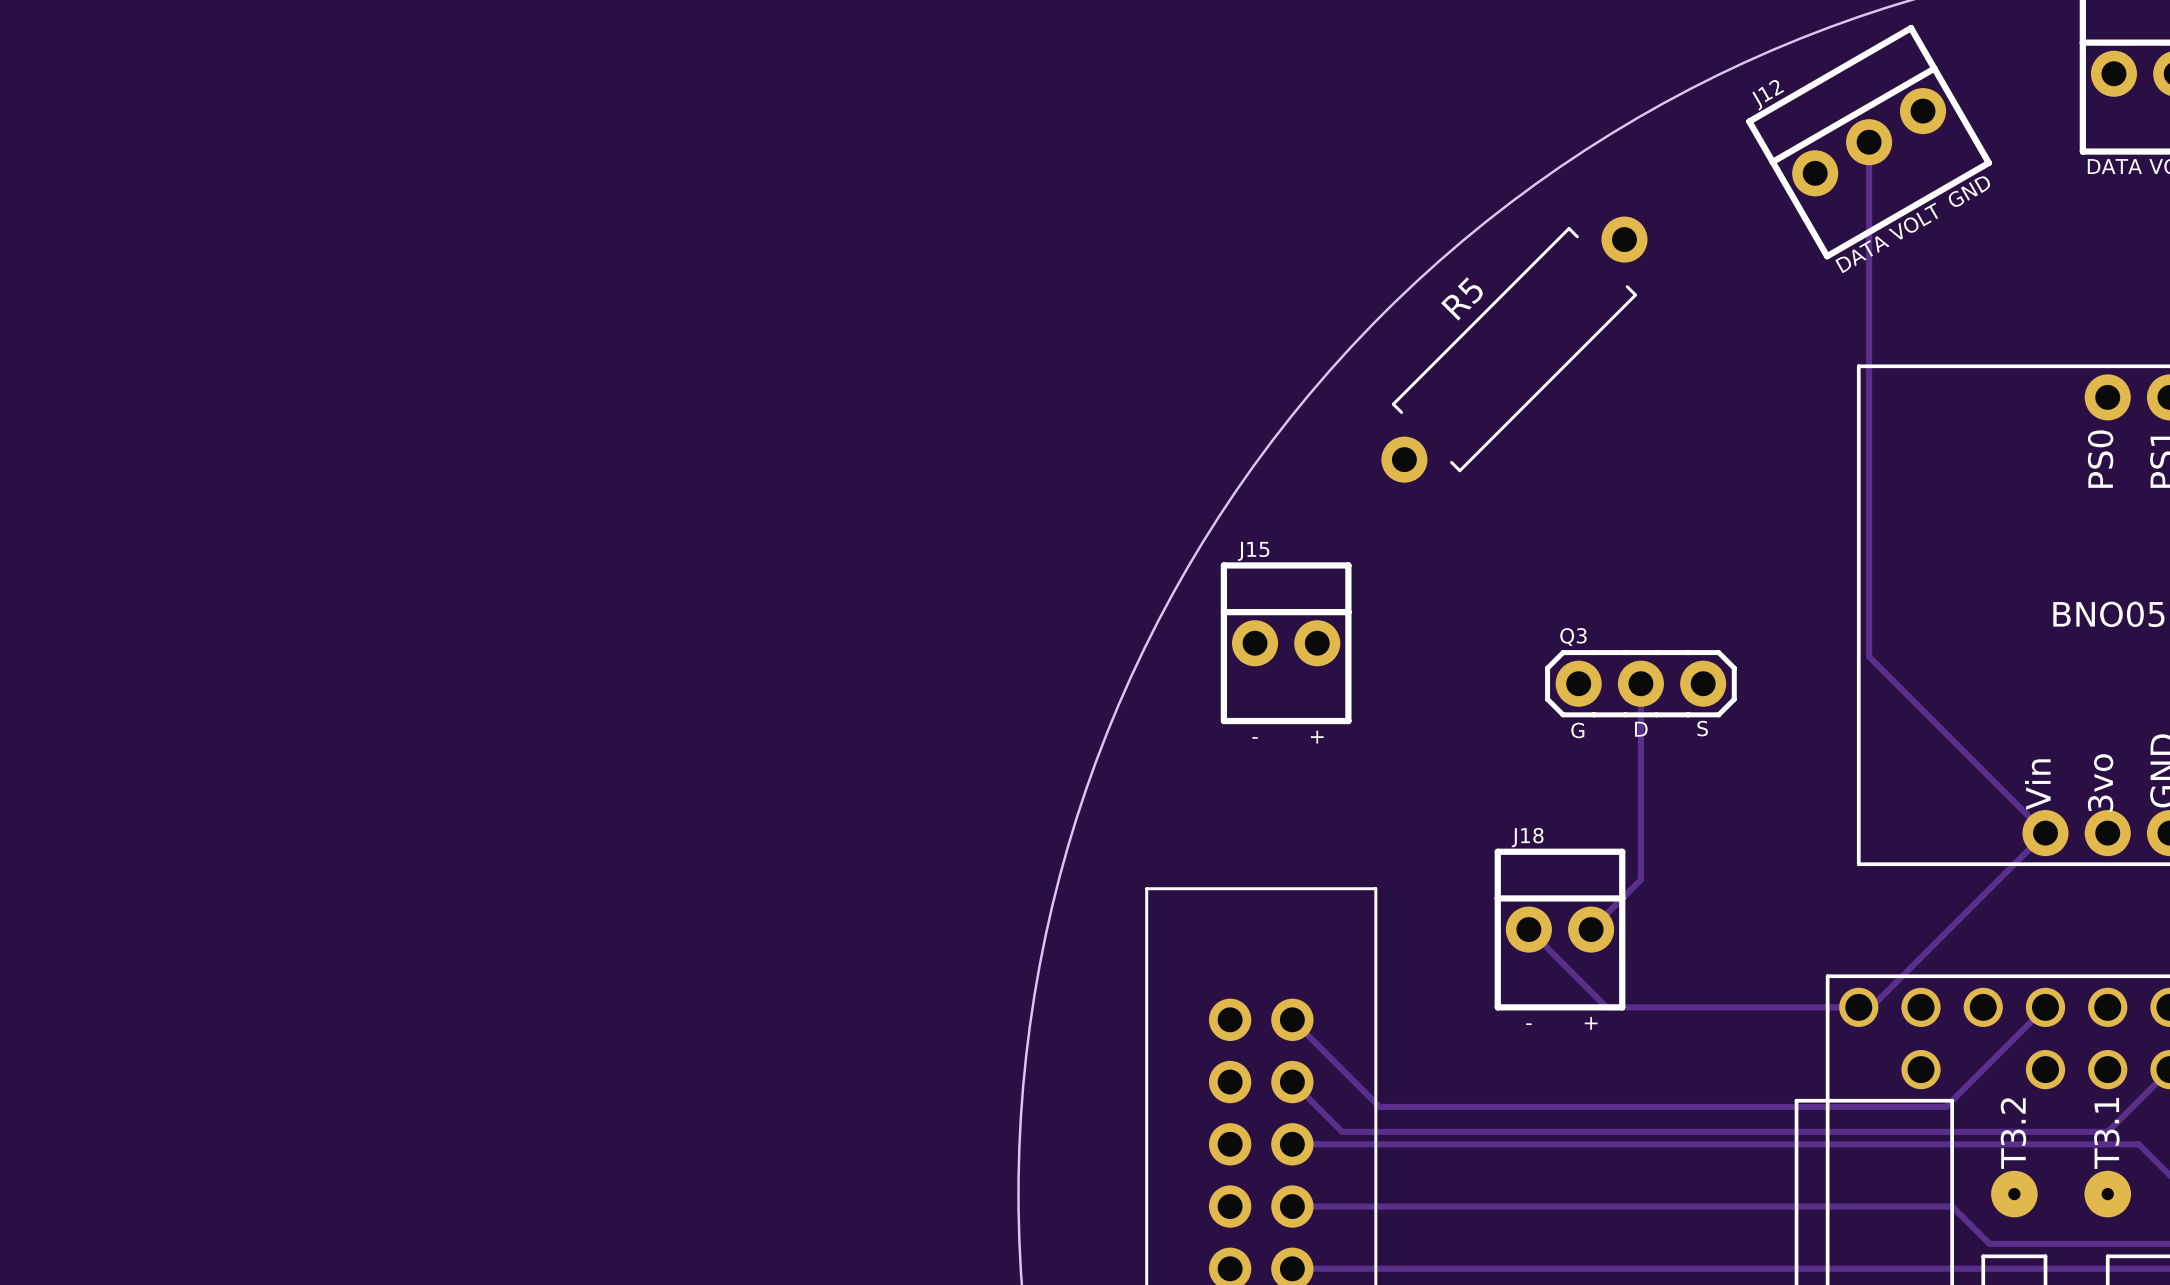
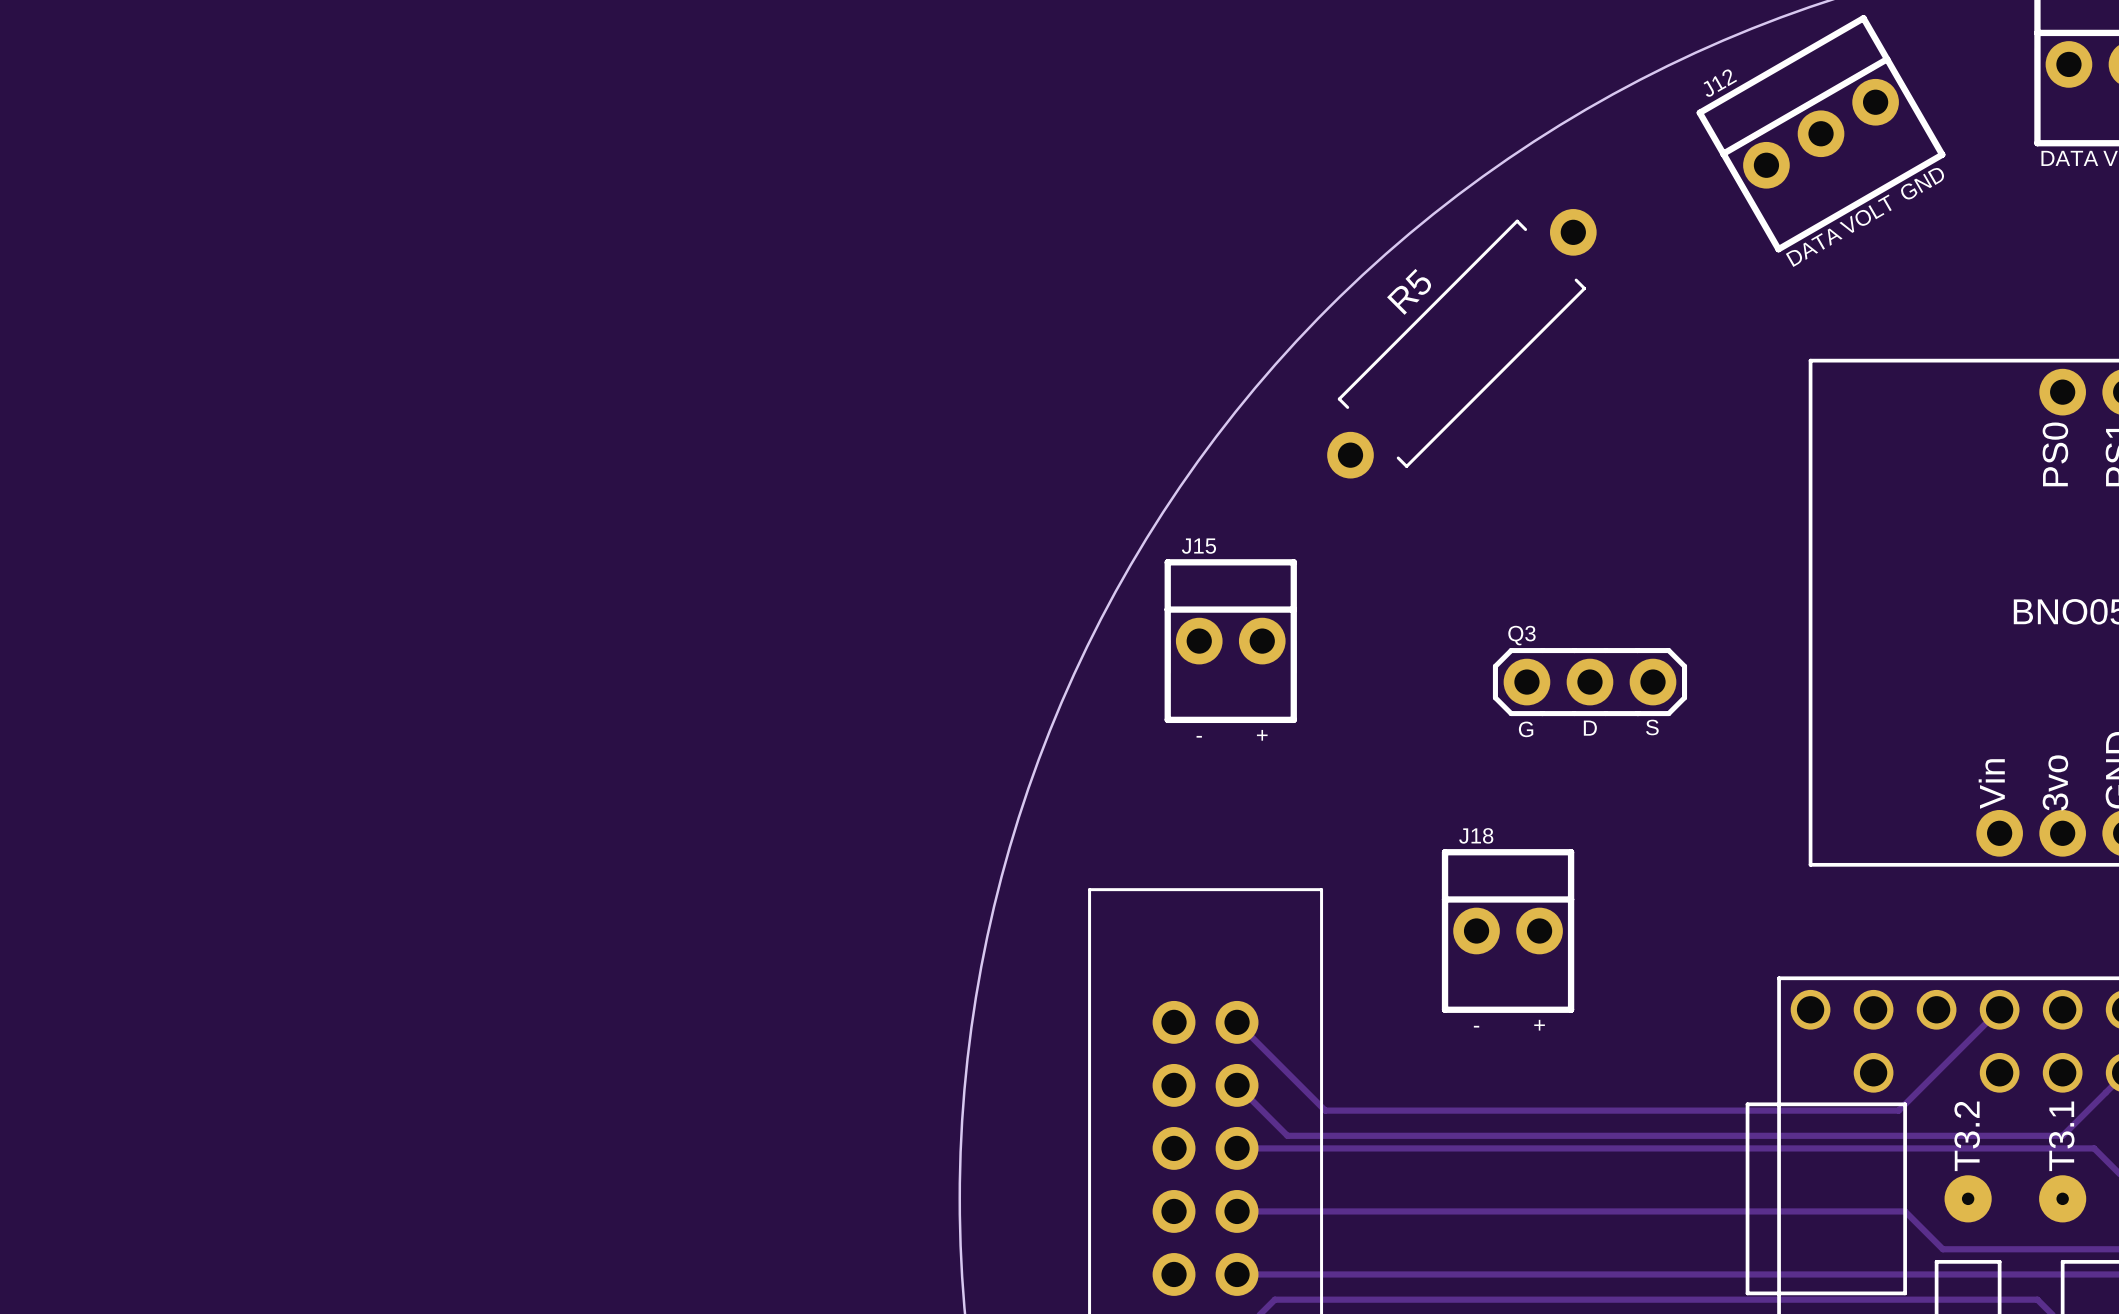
track: (1869, 142) (1869, 656) (2045, 833) (1871, 1007) (1606, 1007) (1528, 929) -> none
track: (1640, 683) (1640, 879) (1591, 929) -> none

